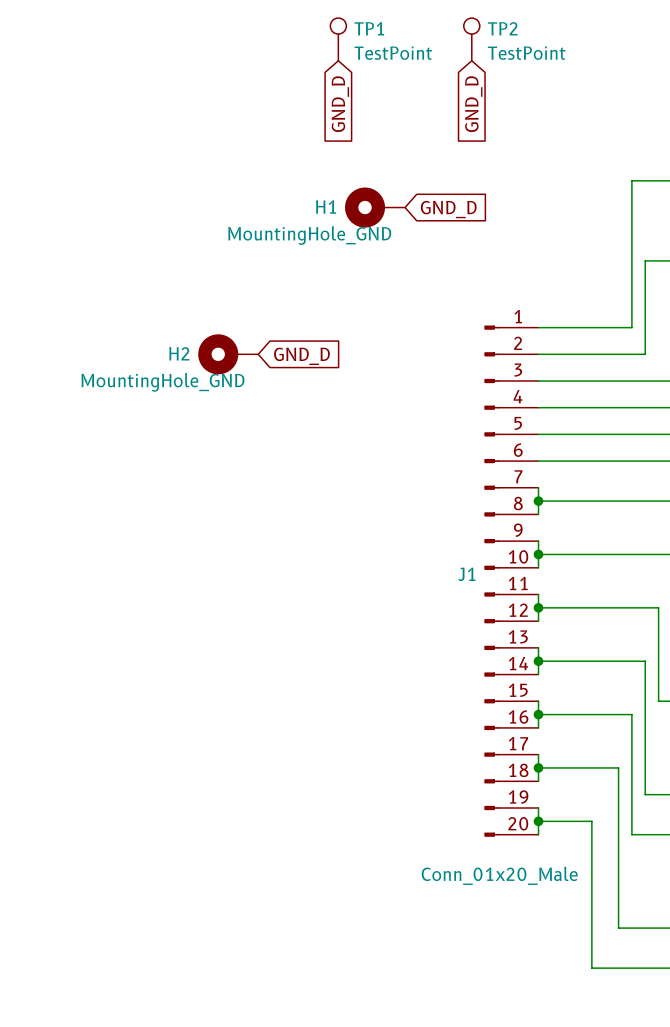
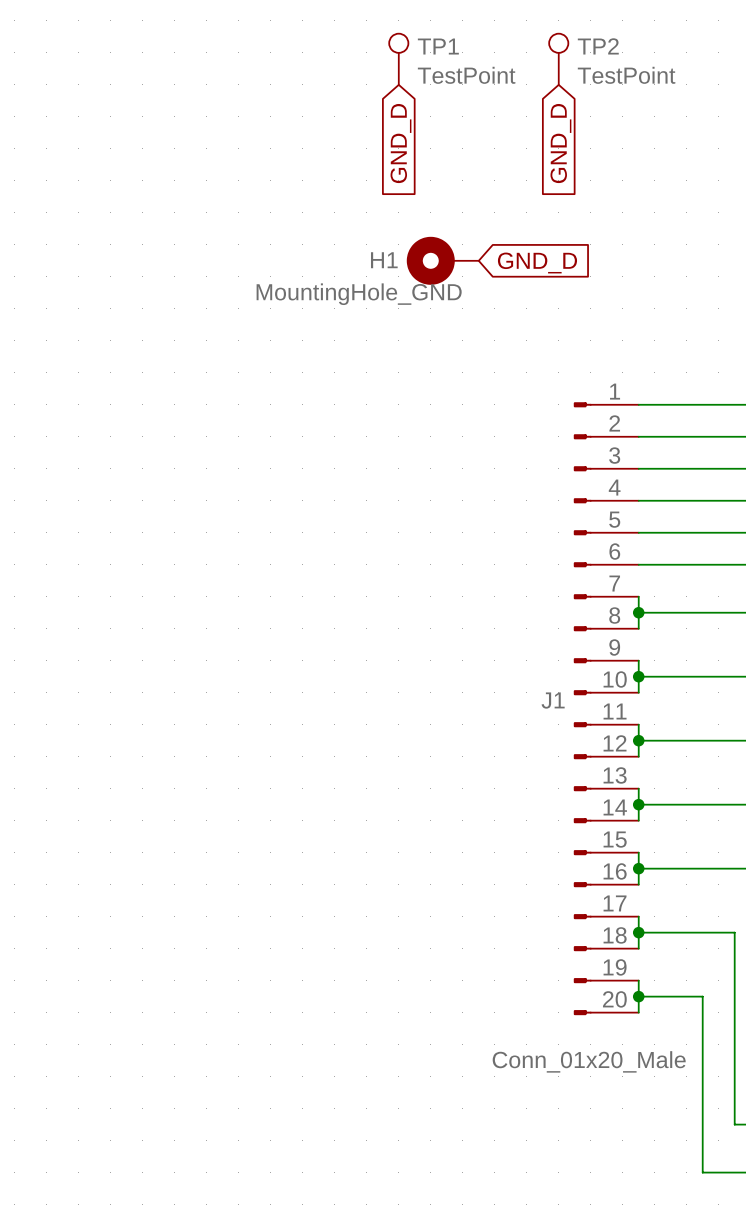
H2: MountingHole_GND (228, 354) -> none
global label: GND_D (301, 356) -> none

